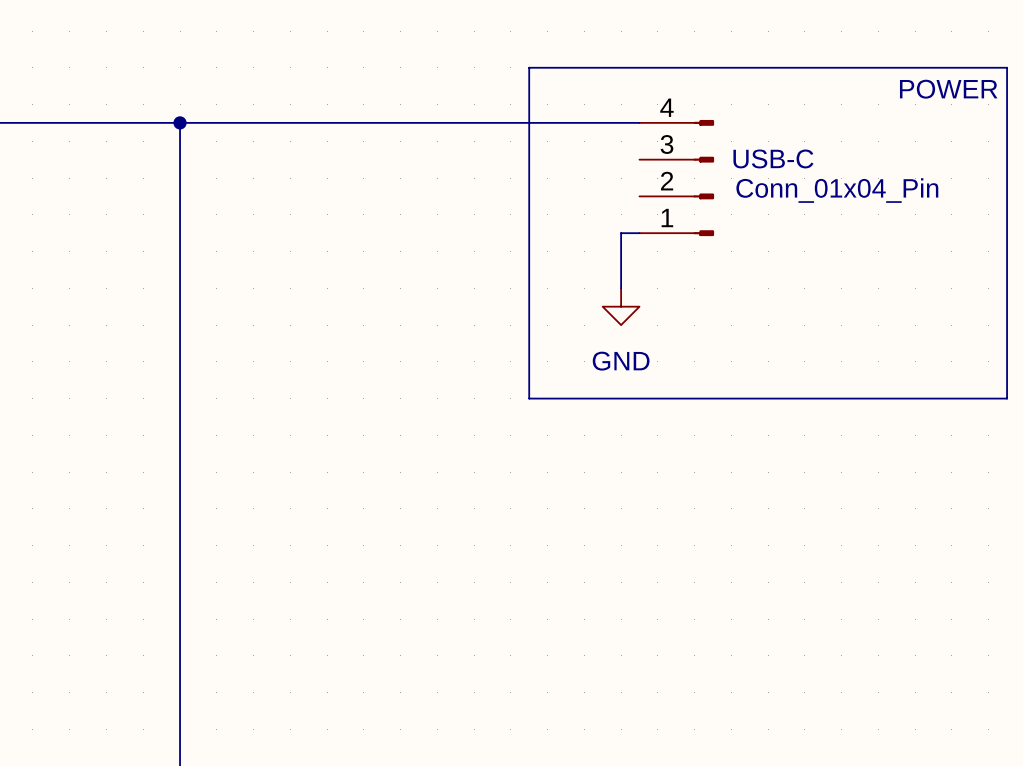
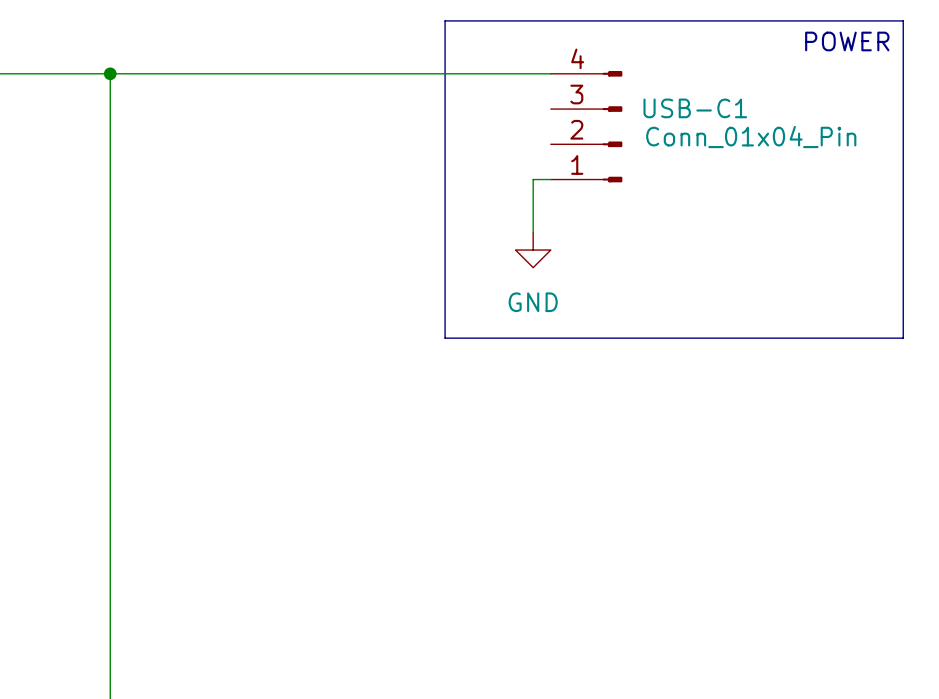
USB-C name: USB-C (773, 158) -> USB-C1 (695, 108)

